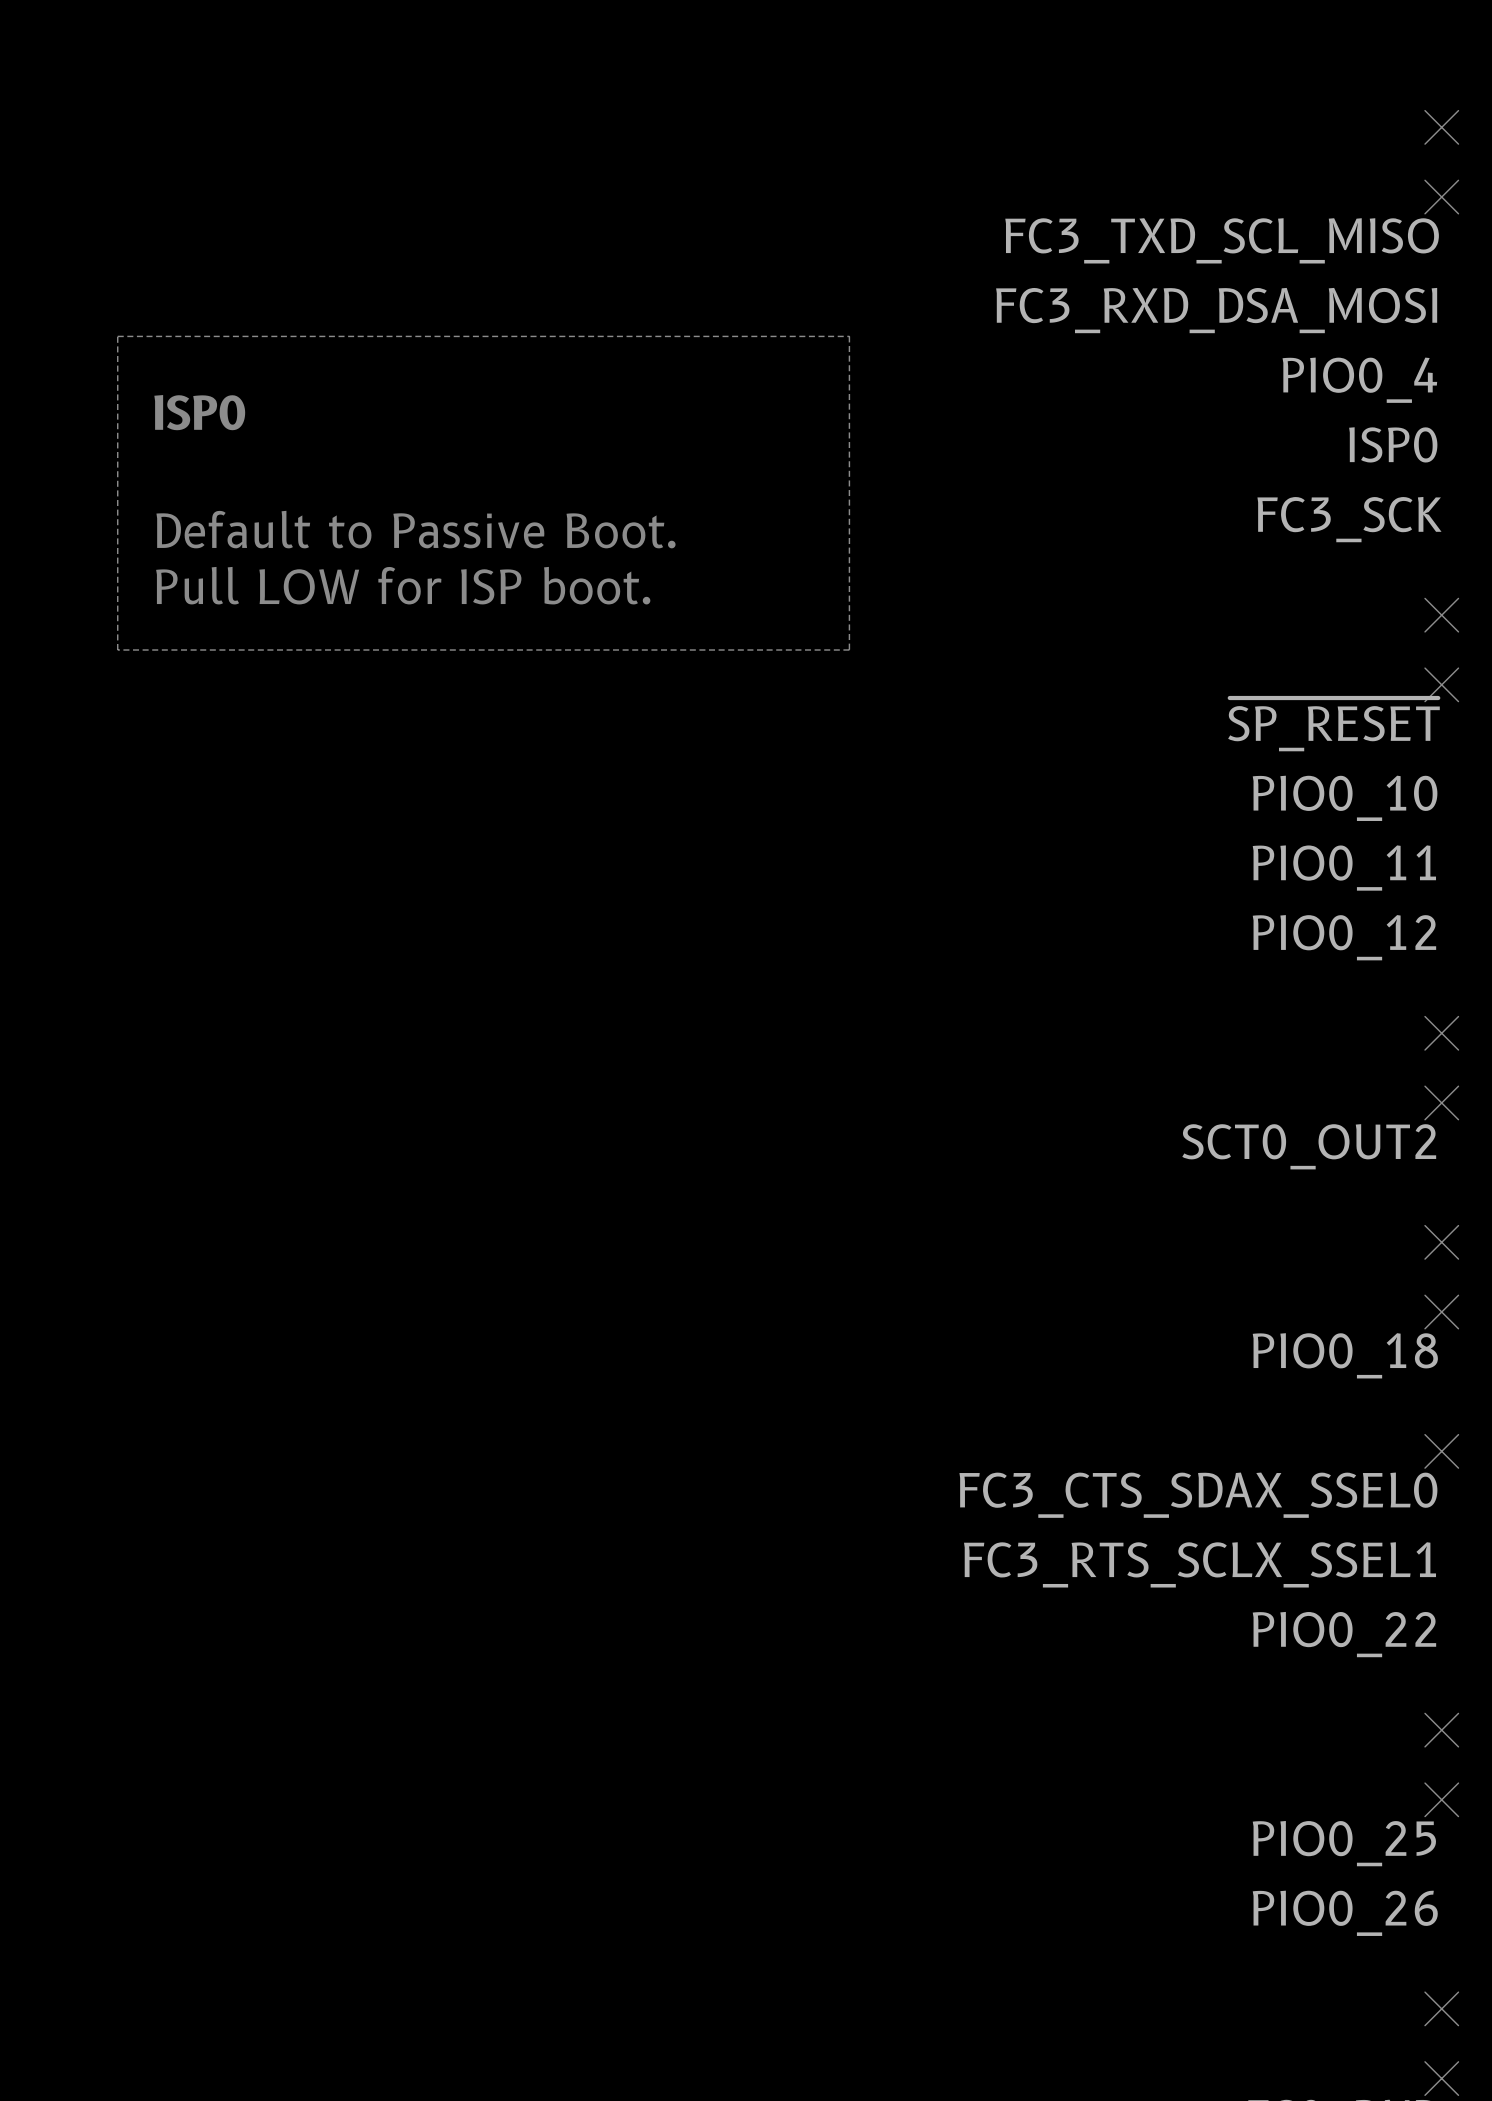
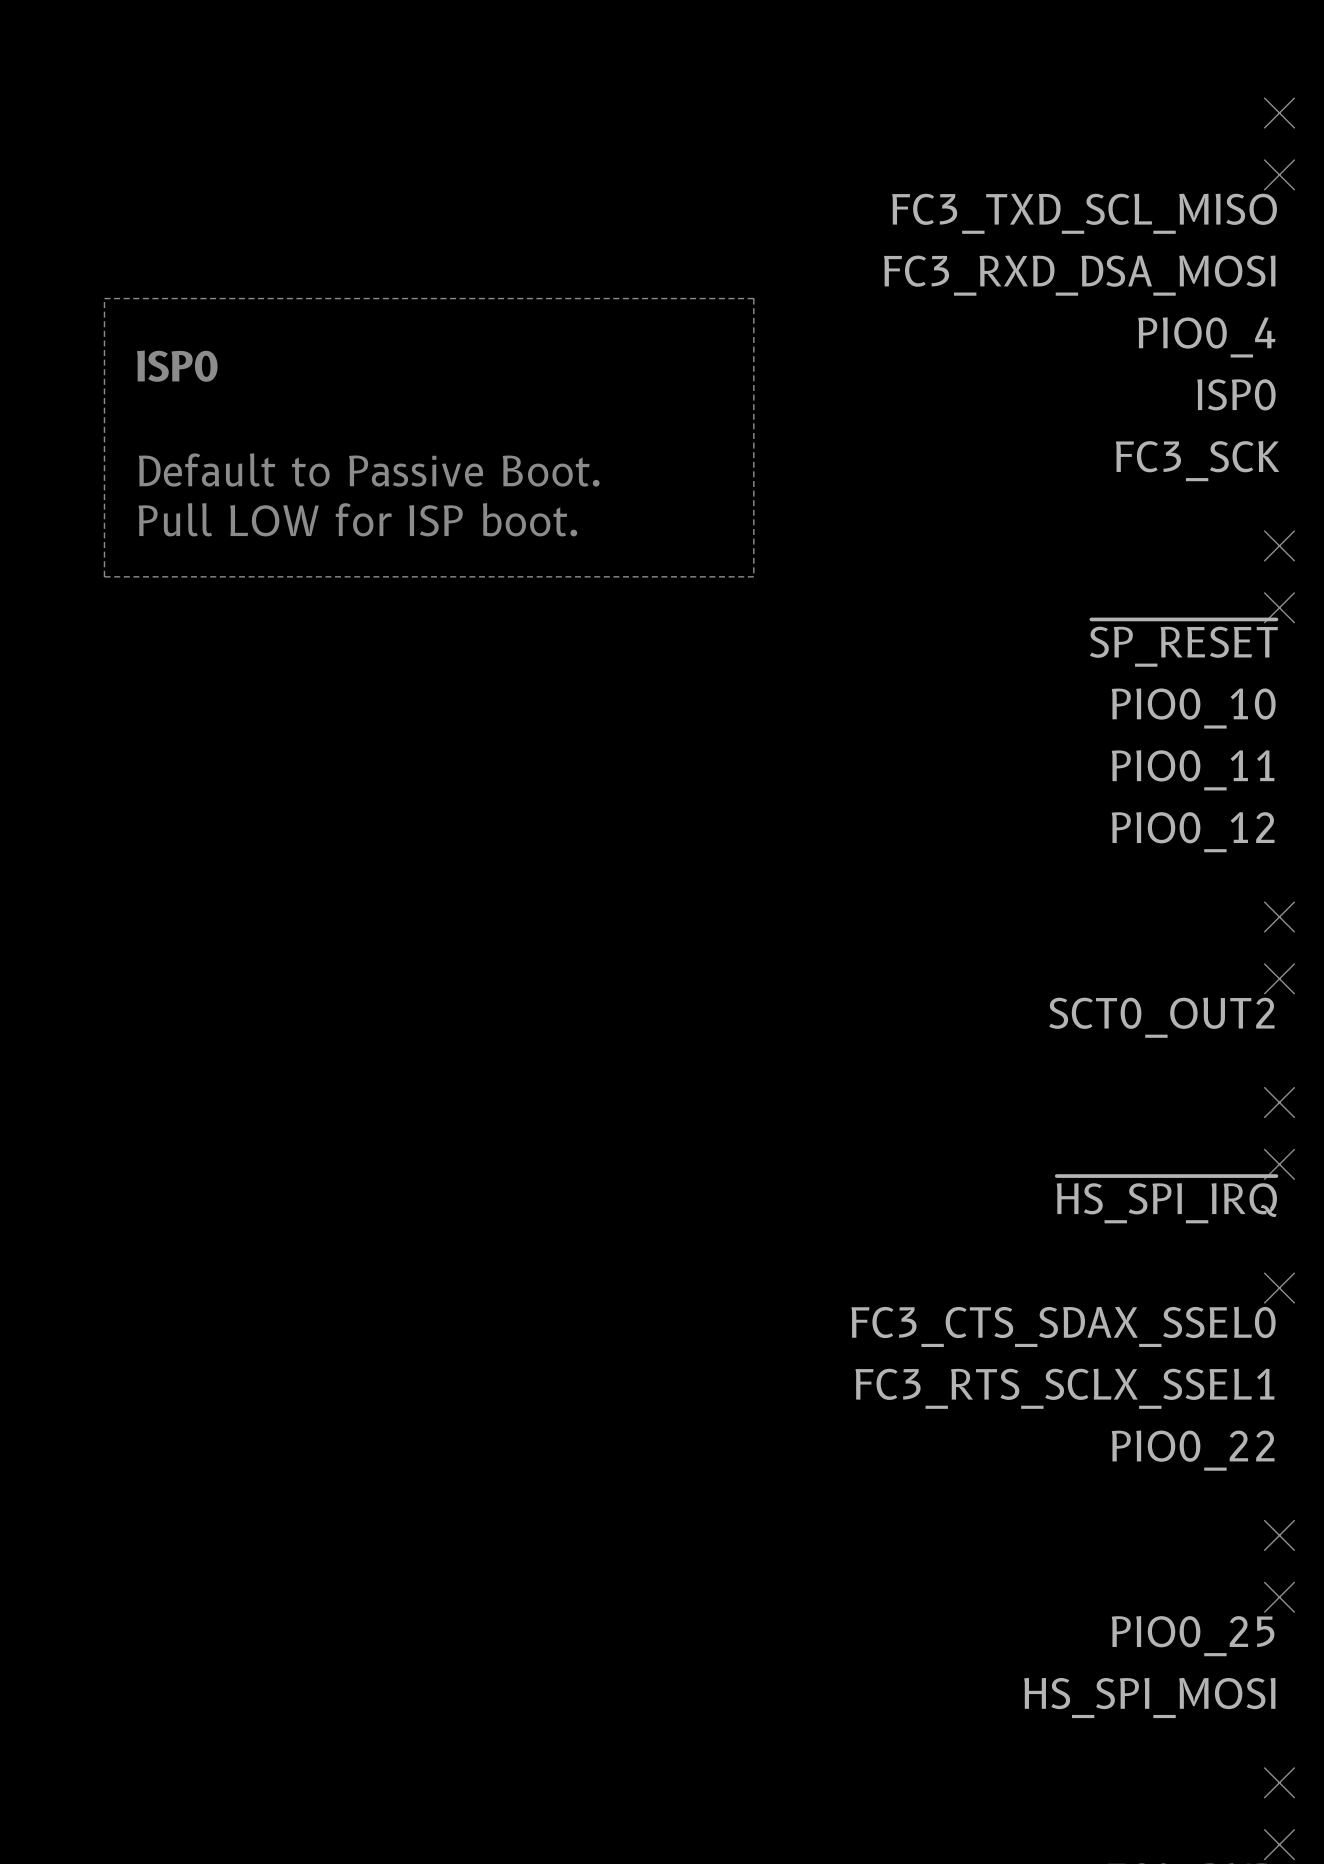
label: PIO0_18 (1345, 1355) -> ~{HS_SPI_IRQ} (1166, 1199)
label: PIO0_26 (1345, 1913) -> HS_SPI_MOSI (1149, 1697)

